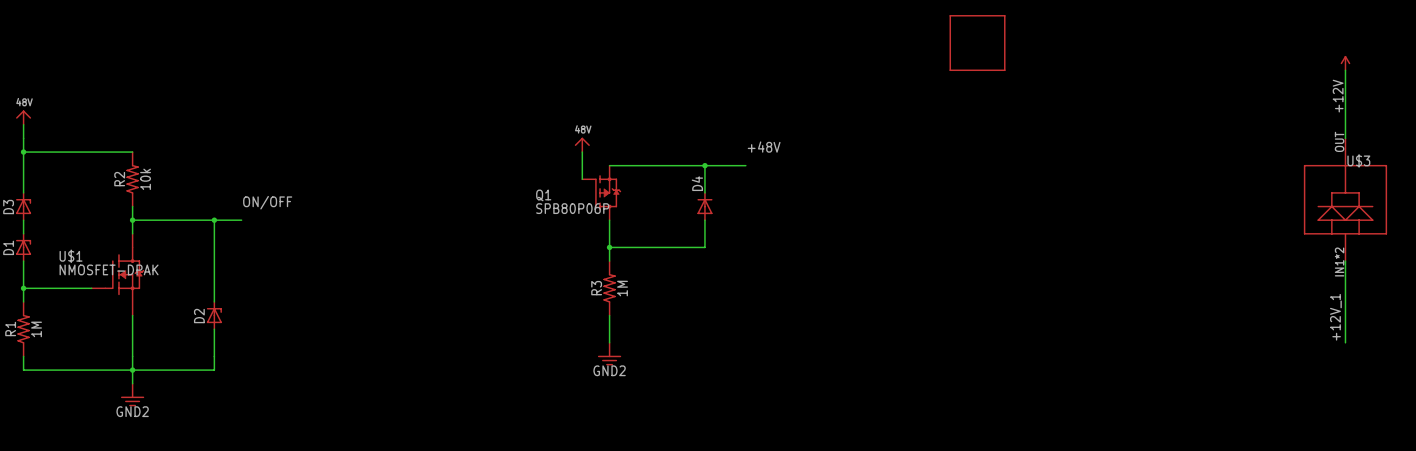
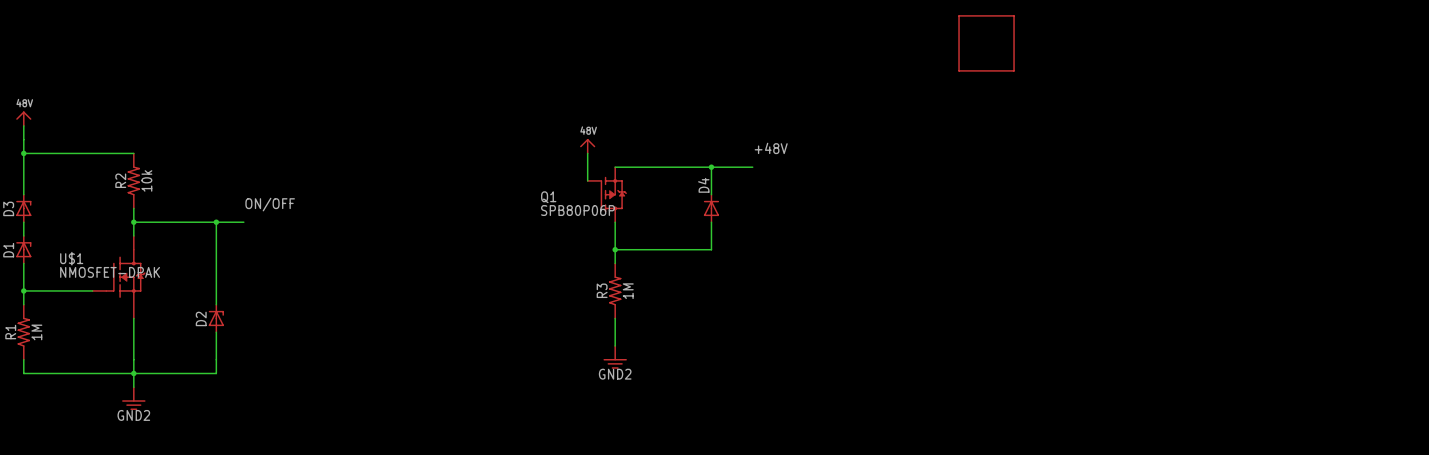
power symbol: (1345, 63) -> none
wire: (1345, 70) (1345, 138) -> none
label: +12V (1338, 96) -> none
U$3: (1345, 199) -> none
wire: (1345, 261) (1345, 342) -> none
label: +12V_1 (1335, 317) -> none

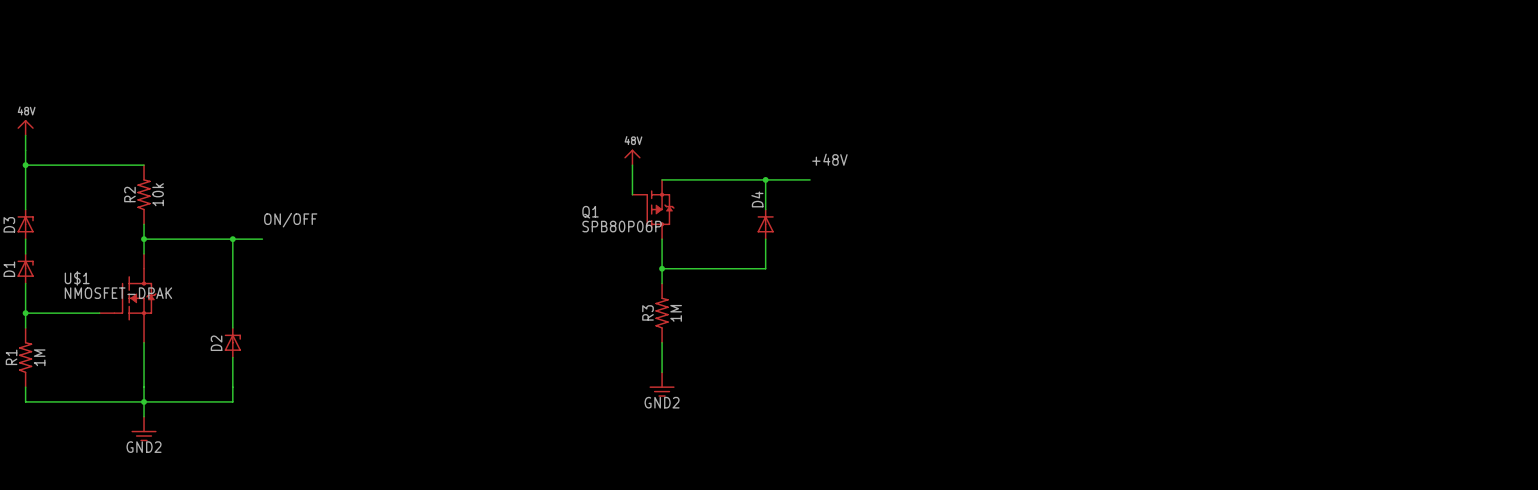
part: (986, 43) -> none

